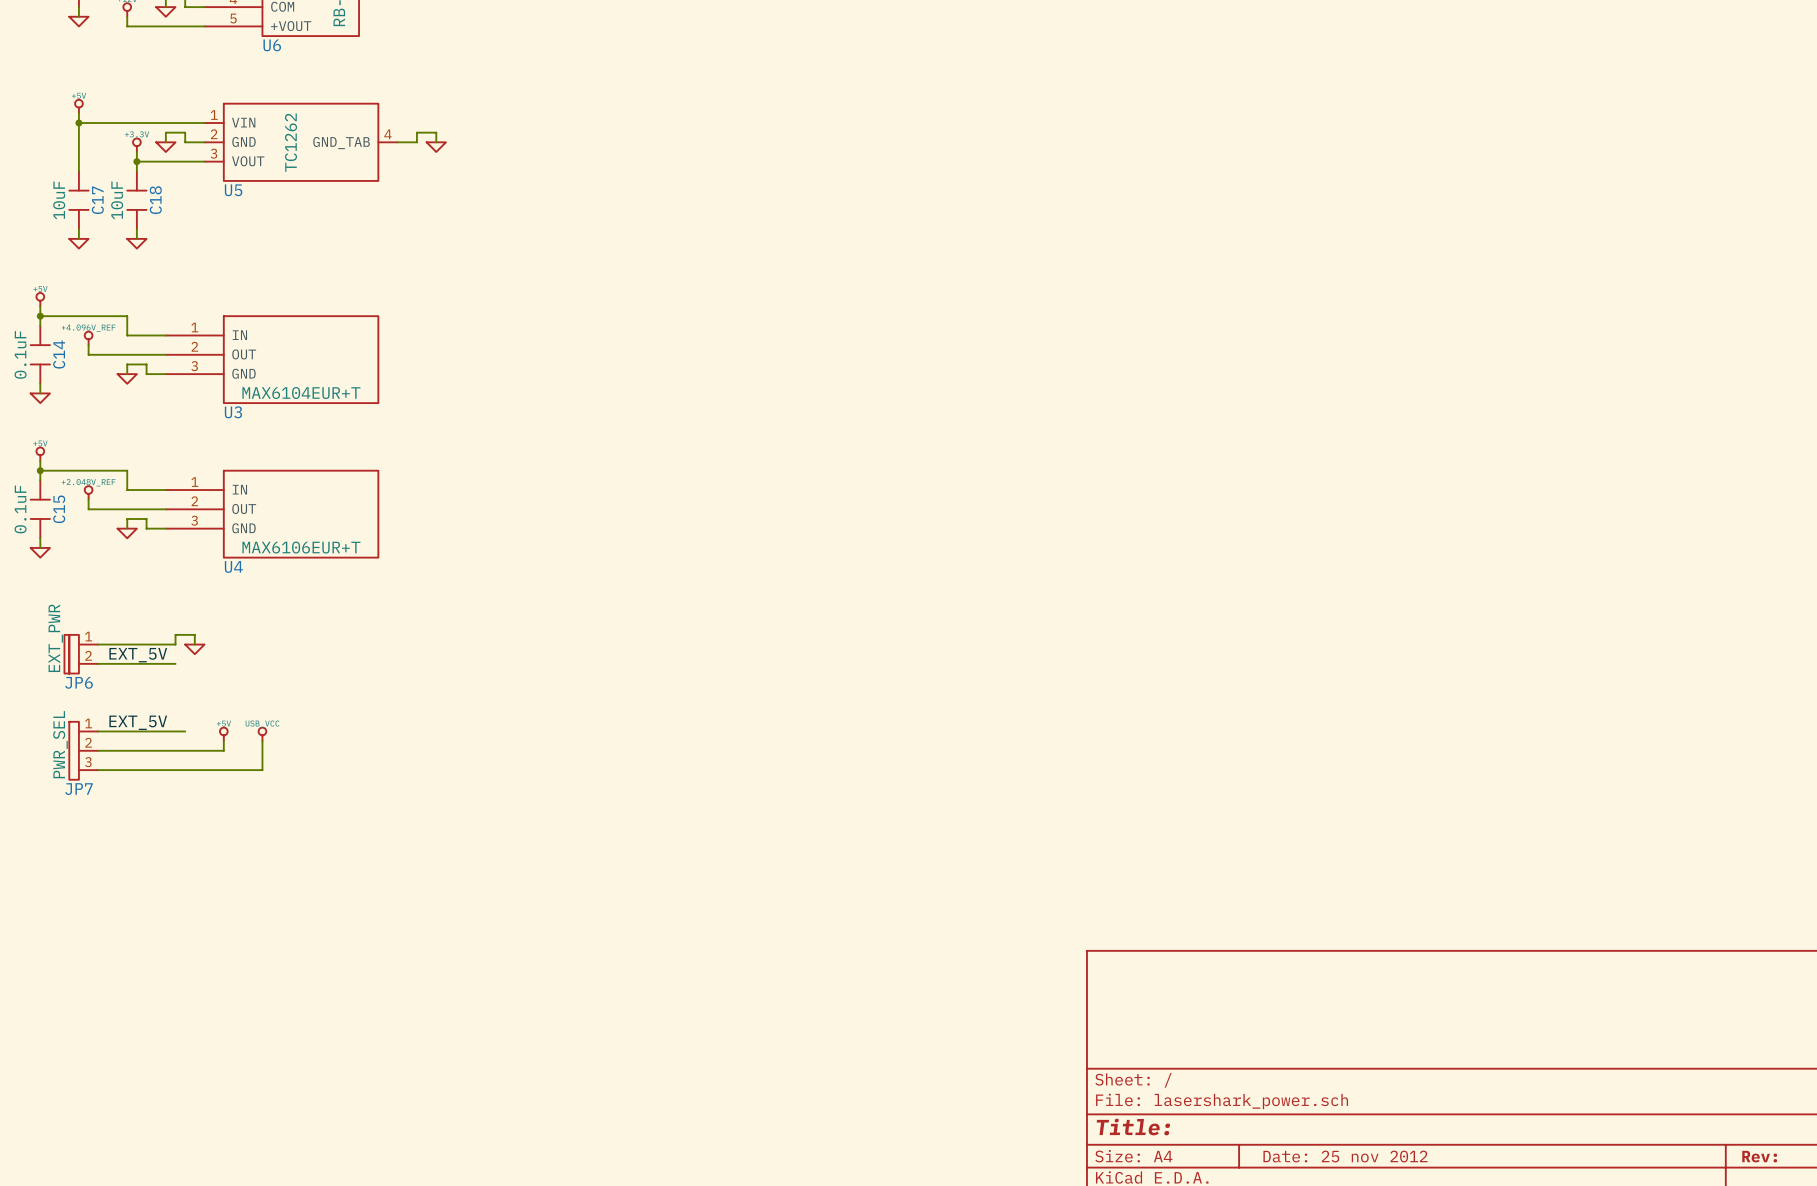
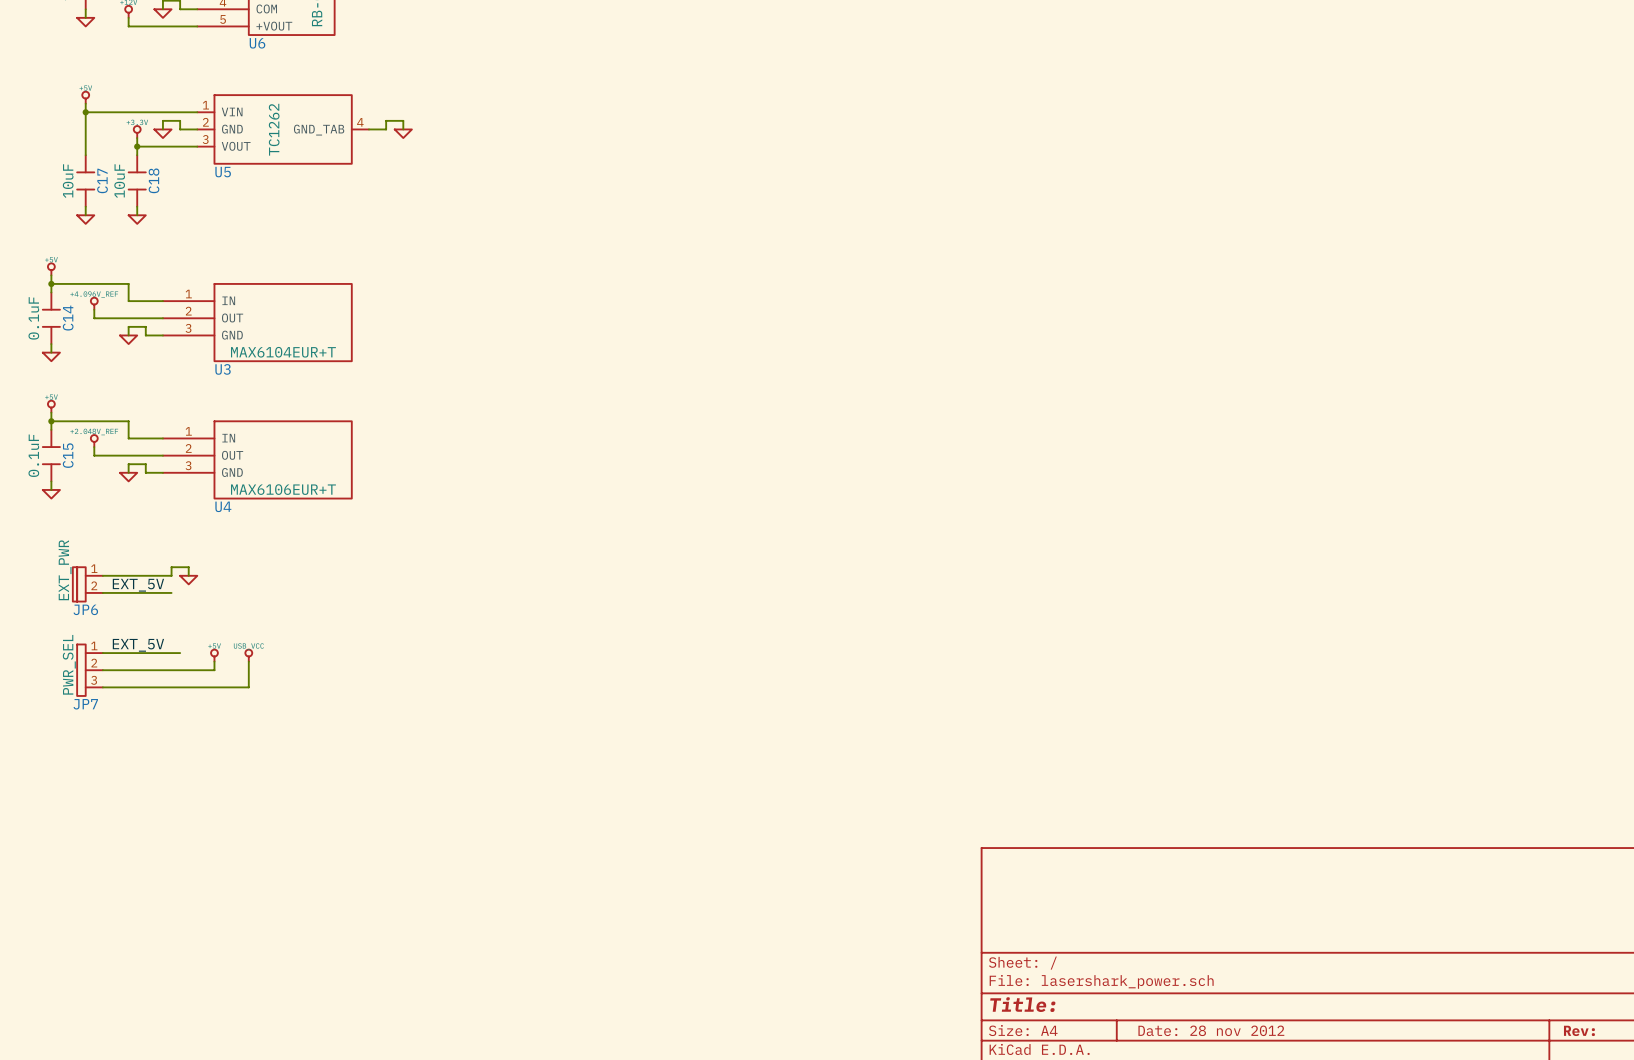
title block: Date: 25 nov 2012 (1345, 1156) -> Date: 28 nov 2012 (1211, 1030)

